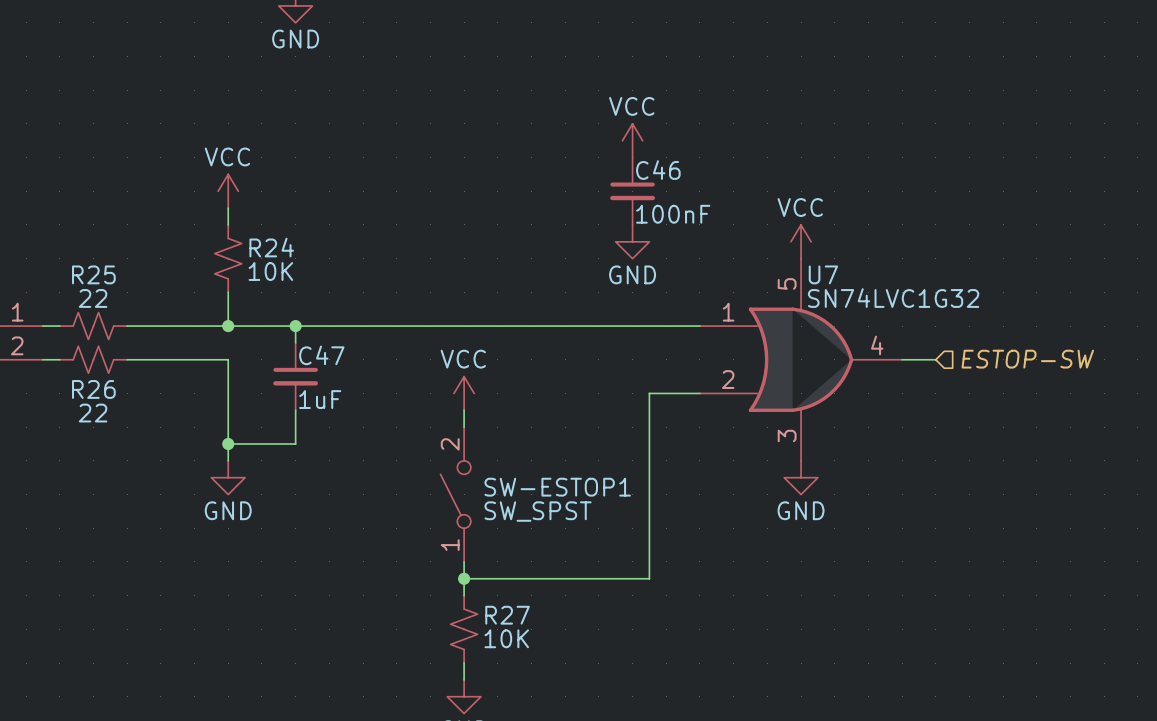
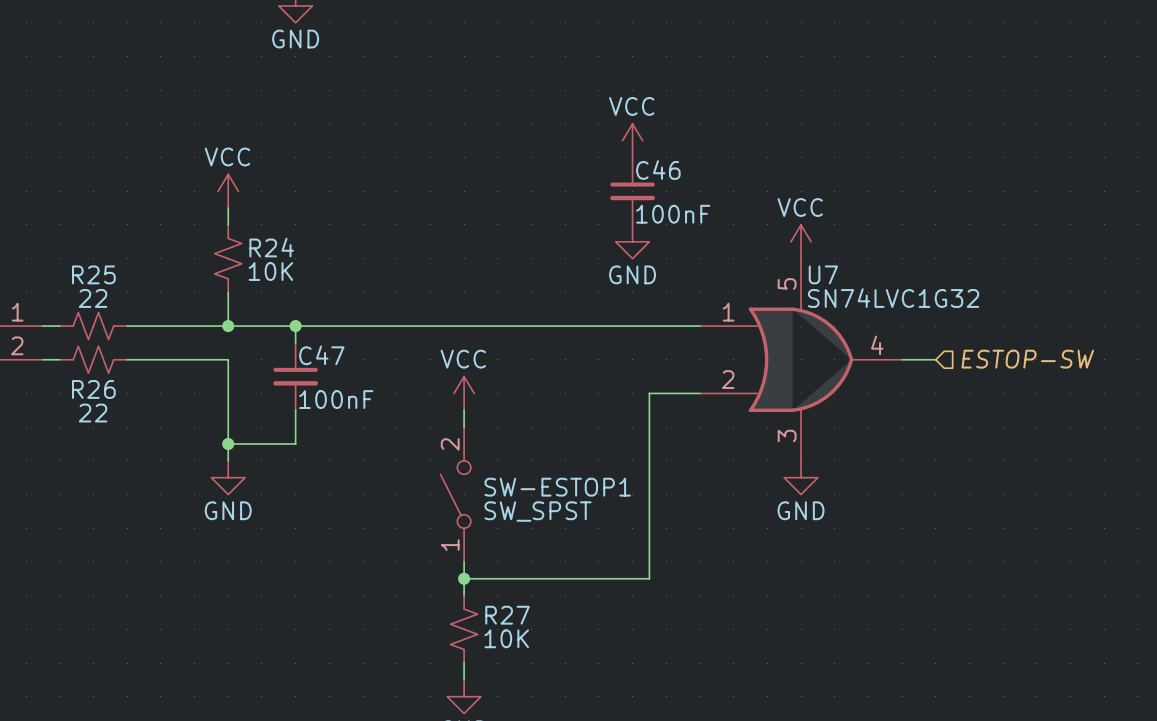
C47 value: 1uF (320, 399) -> 100nF (336, 399)

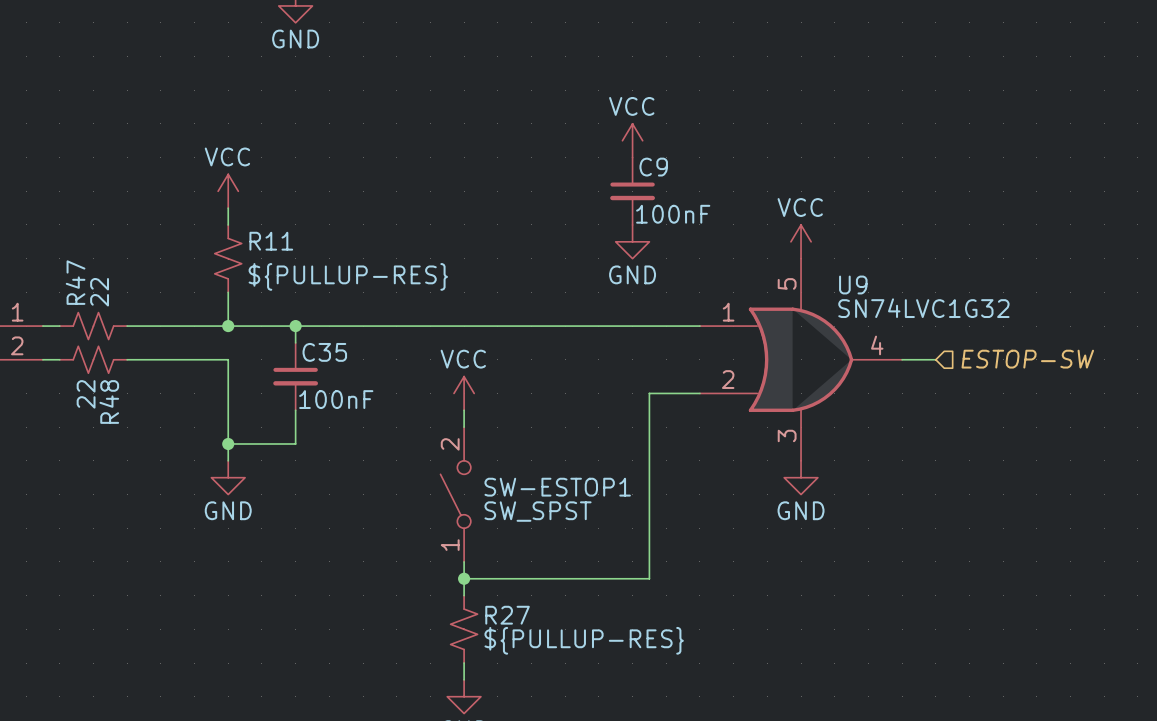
C46 name: C46 (658, 170) -> C9 (653, 167)
R24 name: R24 (271, 247) -> R11 (271, 241)
R24 value: 10K (270, 271) -> ${PULLUP-RES} (348, 276)
R25 name: R25 (93, 274) -> R47 (75, 282)
U7 name: U7 (823, 274) -> U9 (853, 285)
R25 value rotation: 0° (93, 298) -> 90° counterclockwise (99, 292)
U7 value position: SN74LVC1G32 (893, 298) -> SN74LVC1G32 (923, 308)
C47 name: C47 (321, 355) -> C35 (324, 352)
R26 name: R26 (93, 389) -> R48 (109, 402)
R26 value rotation: 0° (93, 413) -> 90° counterclockwise (86, 394)
R27 value: 10K (506, 638) -> ${PULLUP-RES} (584, 640)

